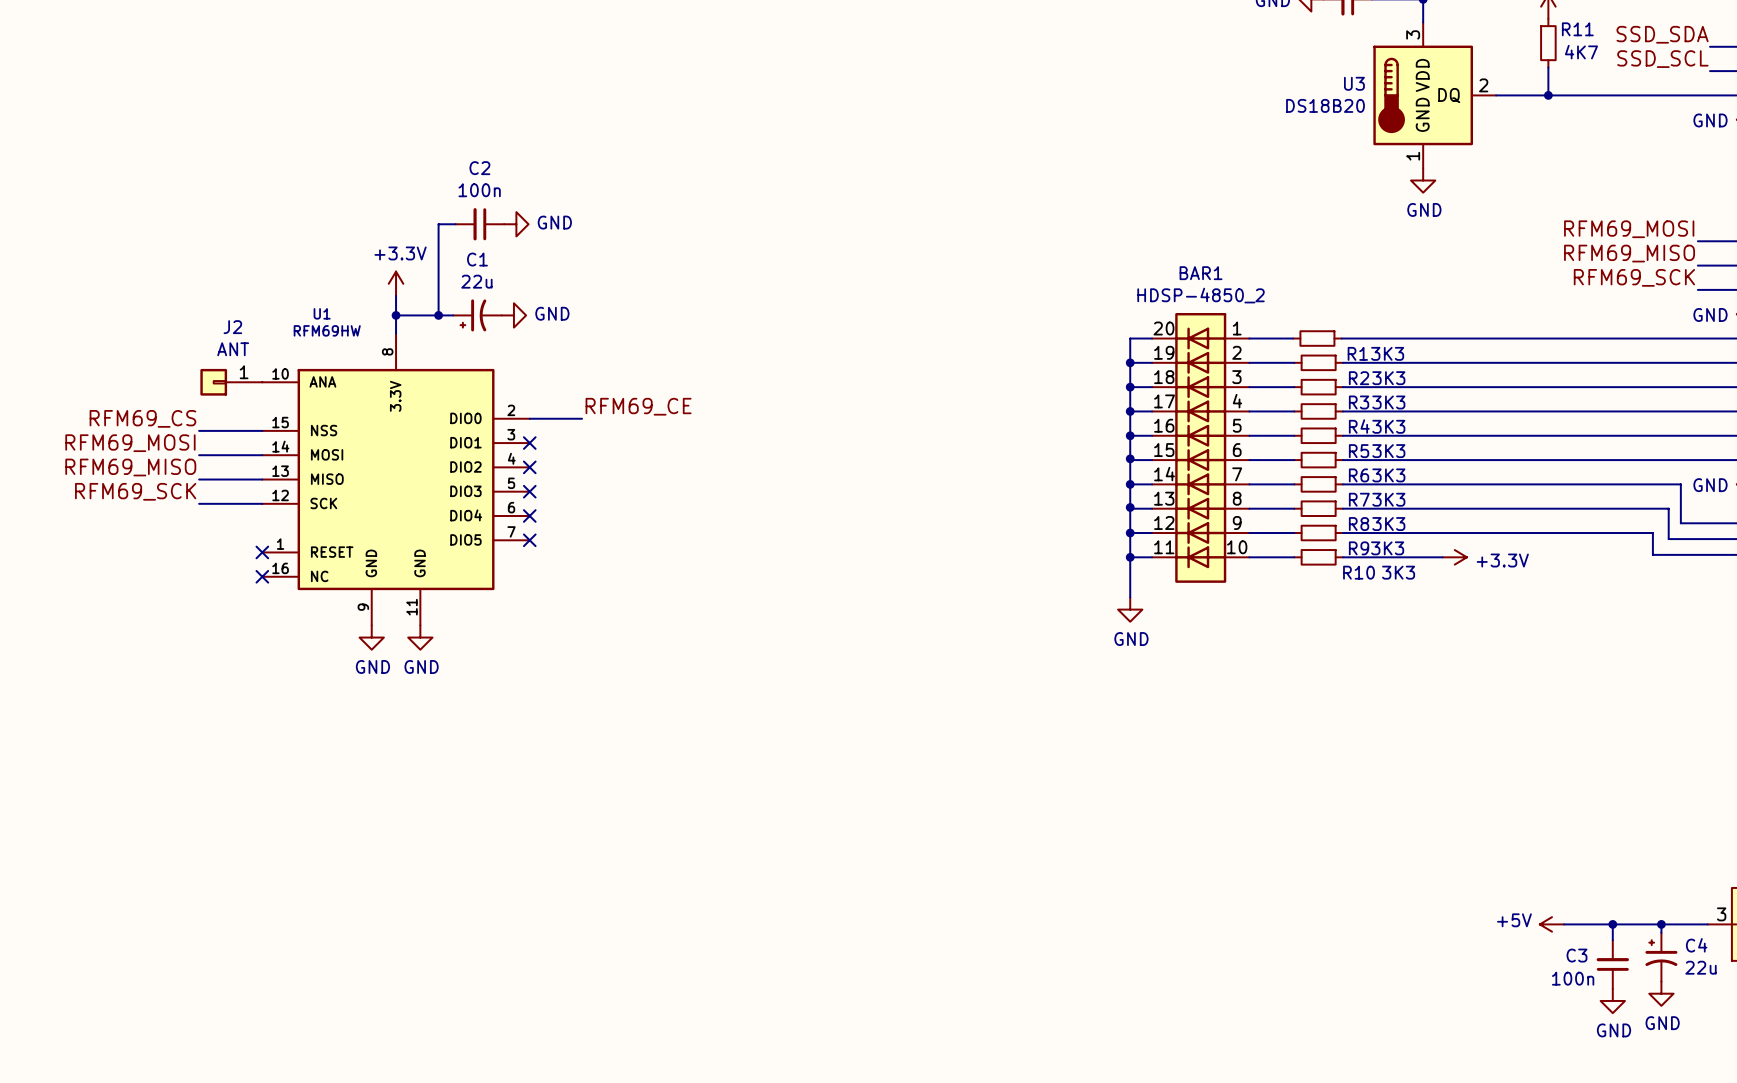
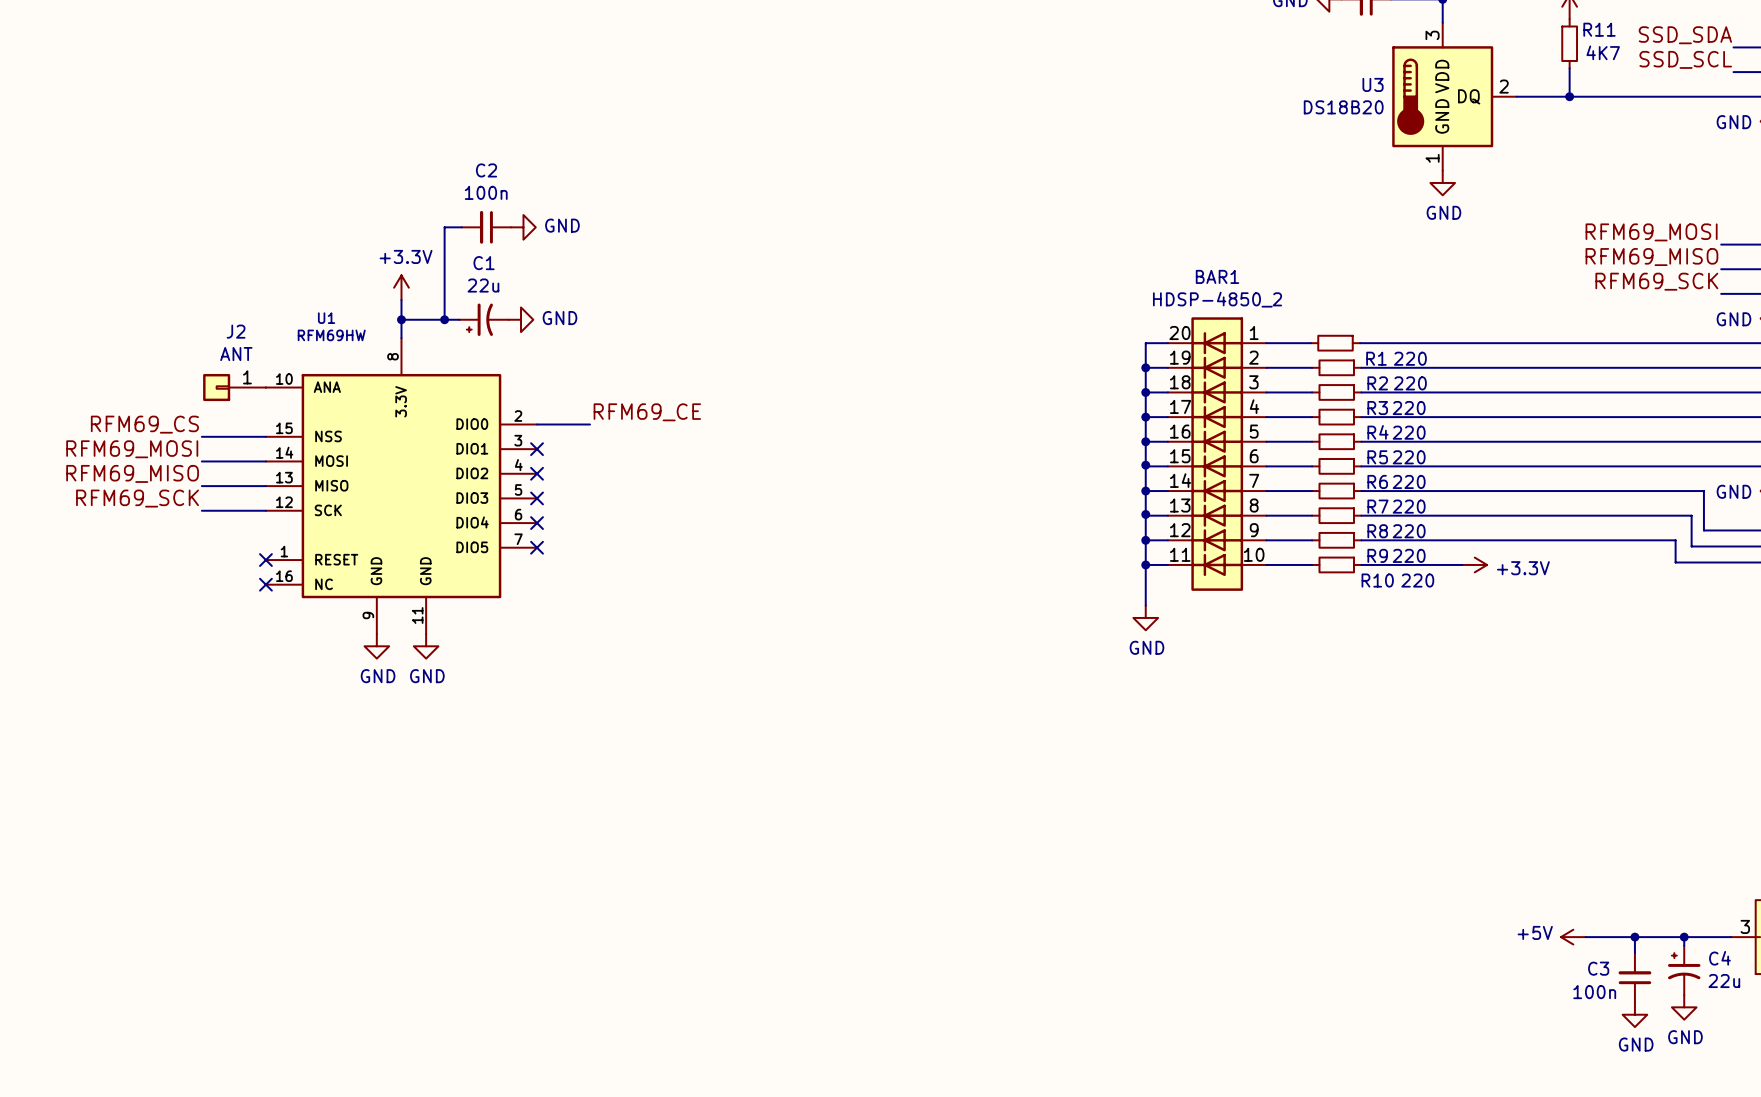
R1 value: 3K3 (1387, 353) -> 220 (1410, 358)
R2 value: 3K3 (1388, 378) -> 220 (1410, 383)
R3 value: 3K3 (1388, 402) -> 220 (1409, 408)
R4 value: 3K3 (1388, 426) -> 220 (1409, 432)
R5 value: 3K3 (1388, 451) -> 220 (1409, 457)
R6 value: 3K3 (1388, 475) -> 220 (1409, 481)
R7 value: 3K3 (1388, 499) -> 220 (1409, 506)
R8 value: 3K3 (1388, 524) -> 220 (1409, 531)
R9 value: 3K3 (1387, 548) -> 220 (1409, 555)
R10 value: 3K3 (1398, 572) -> 220 (1417, 580)

